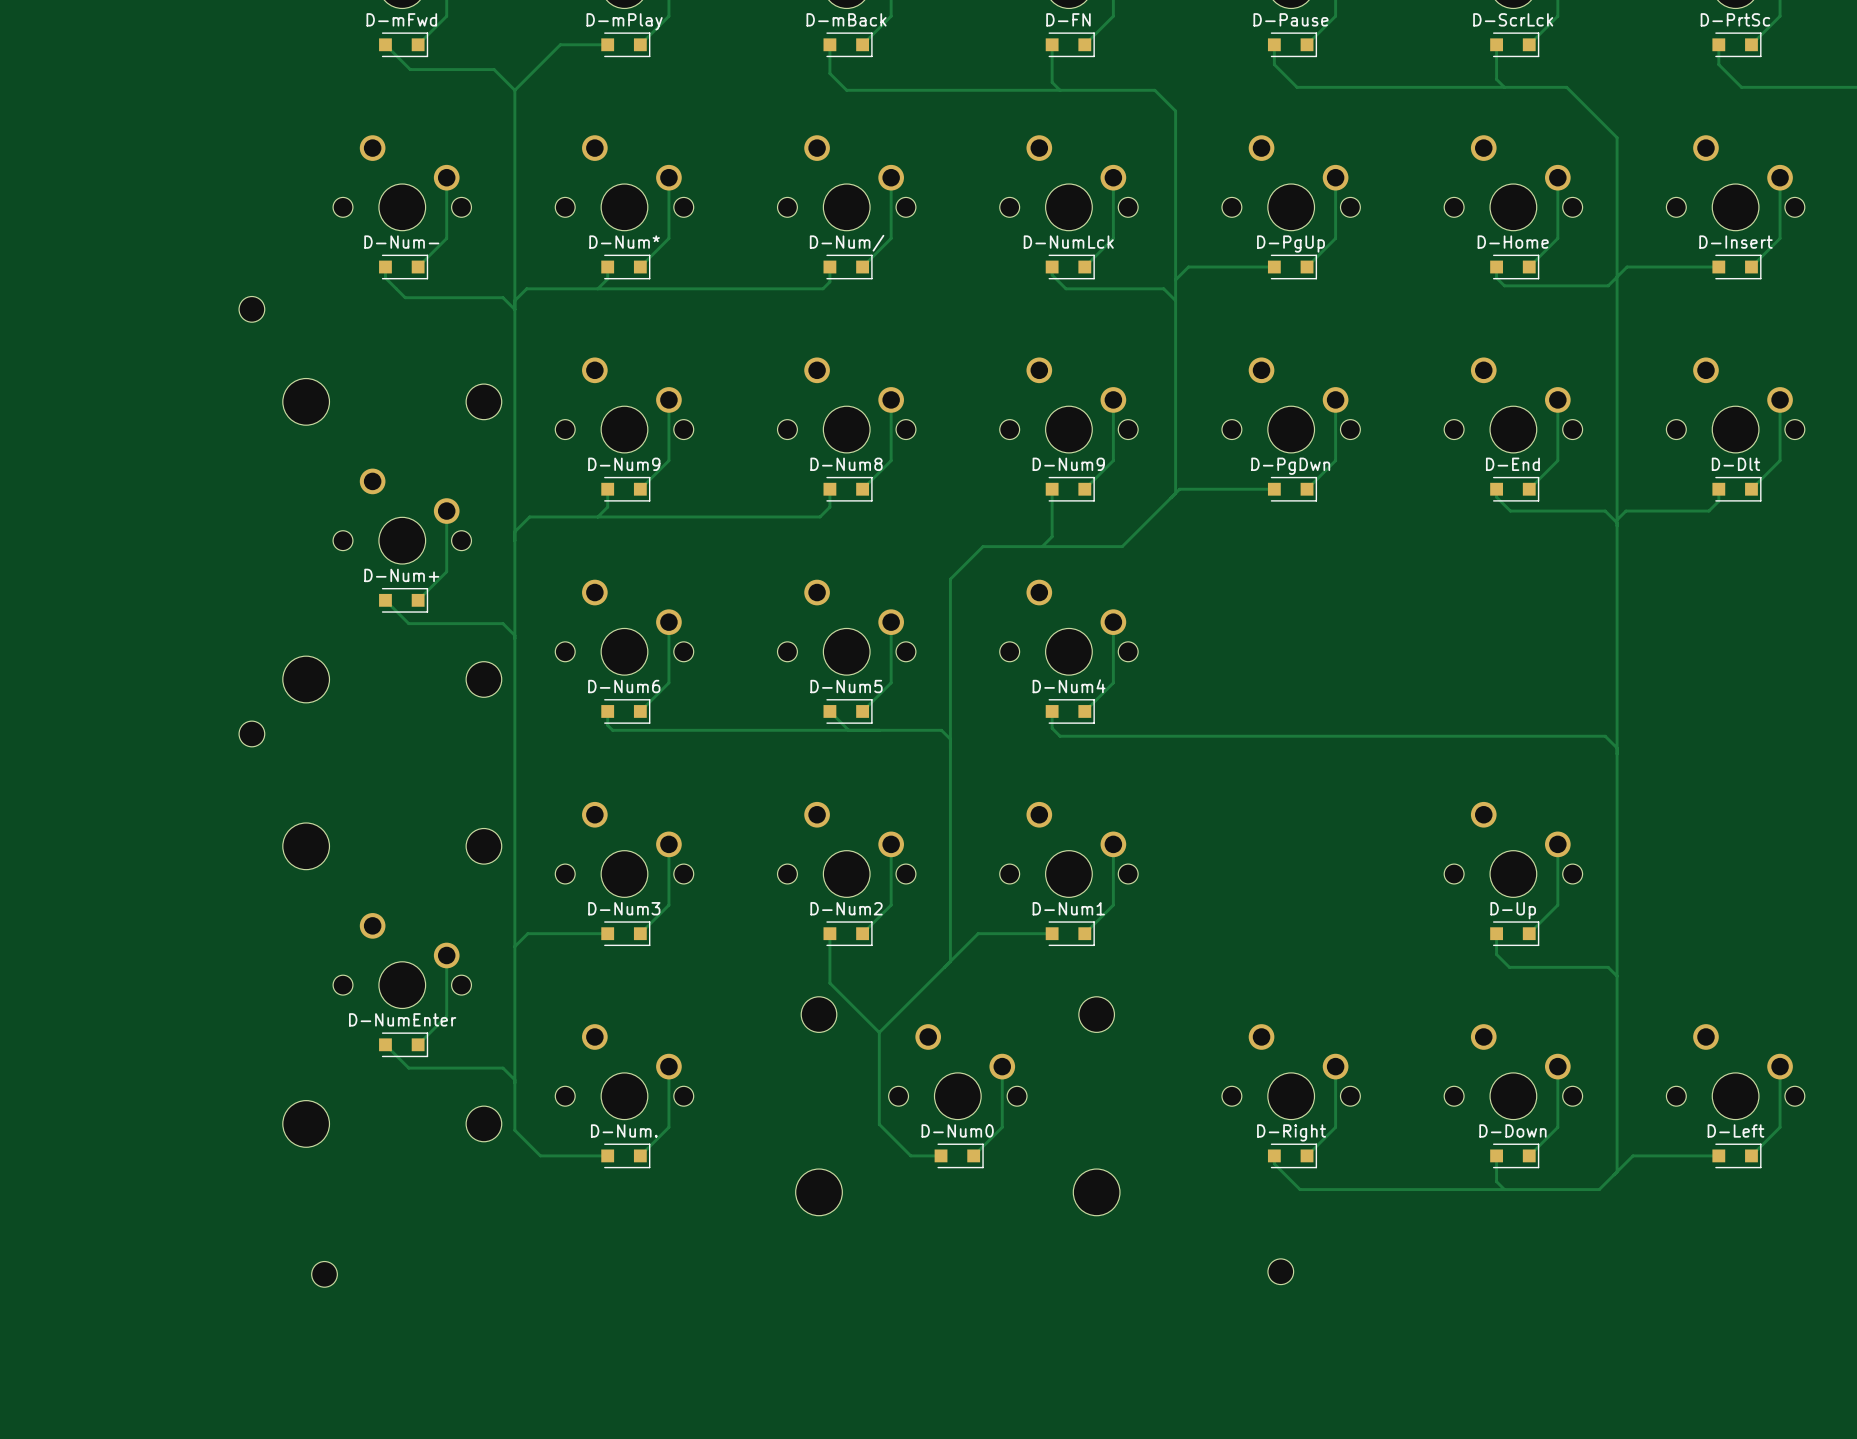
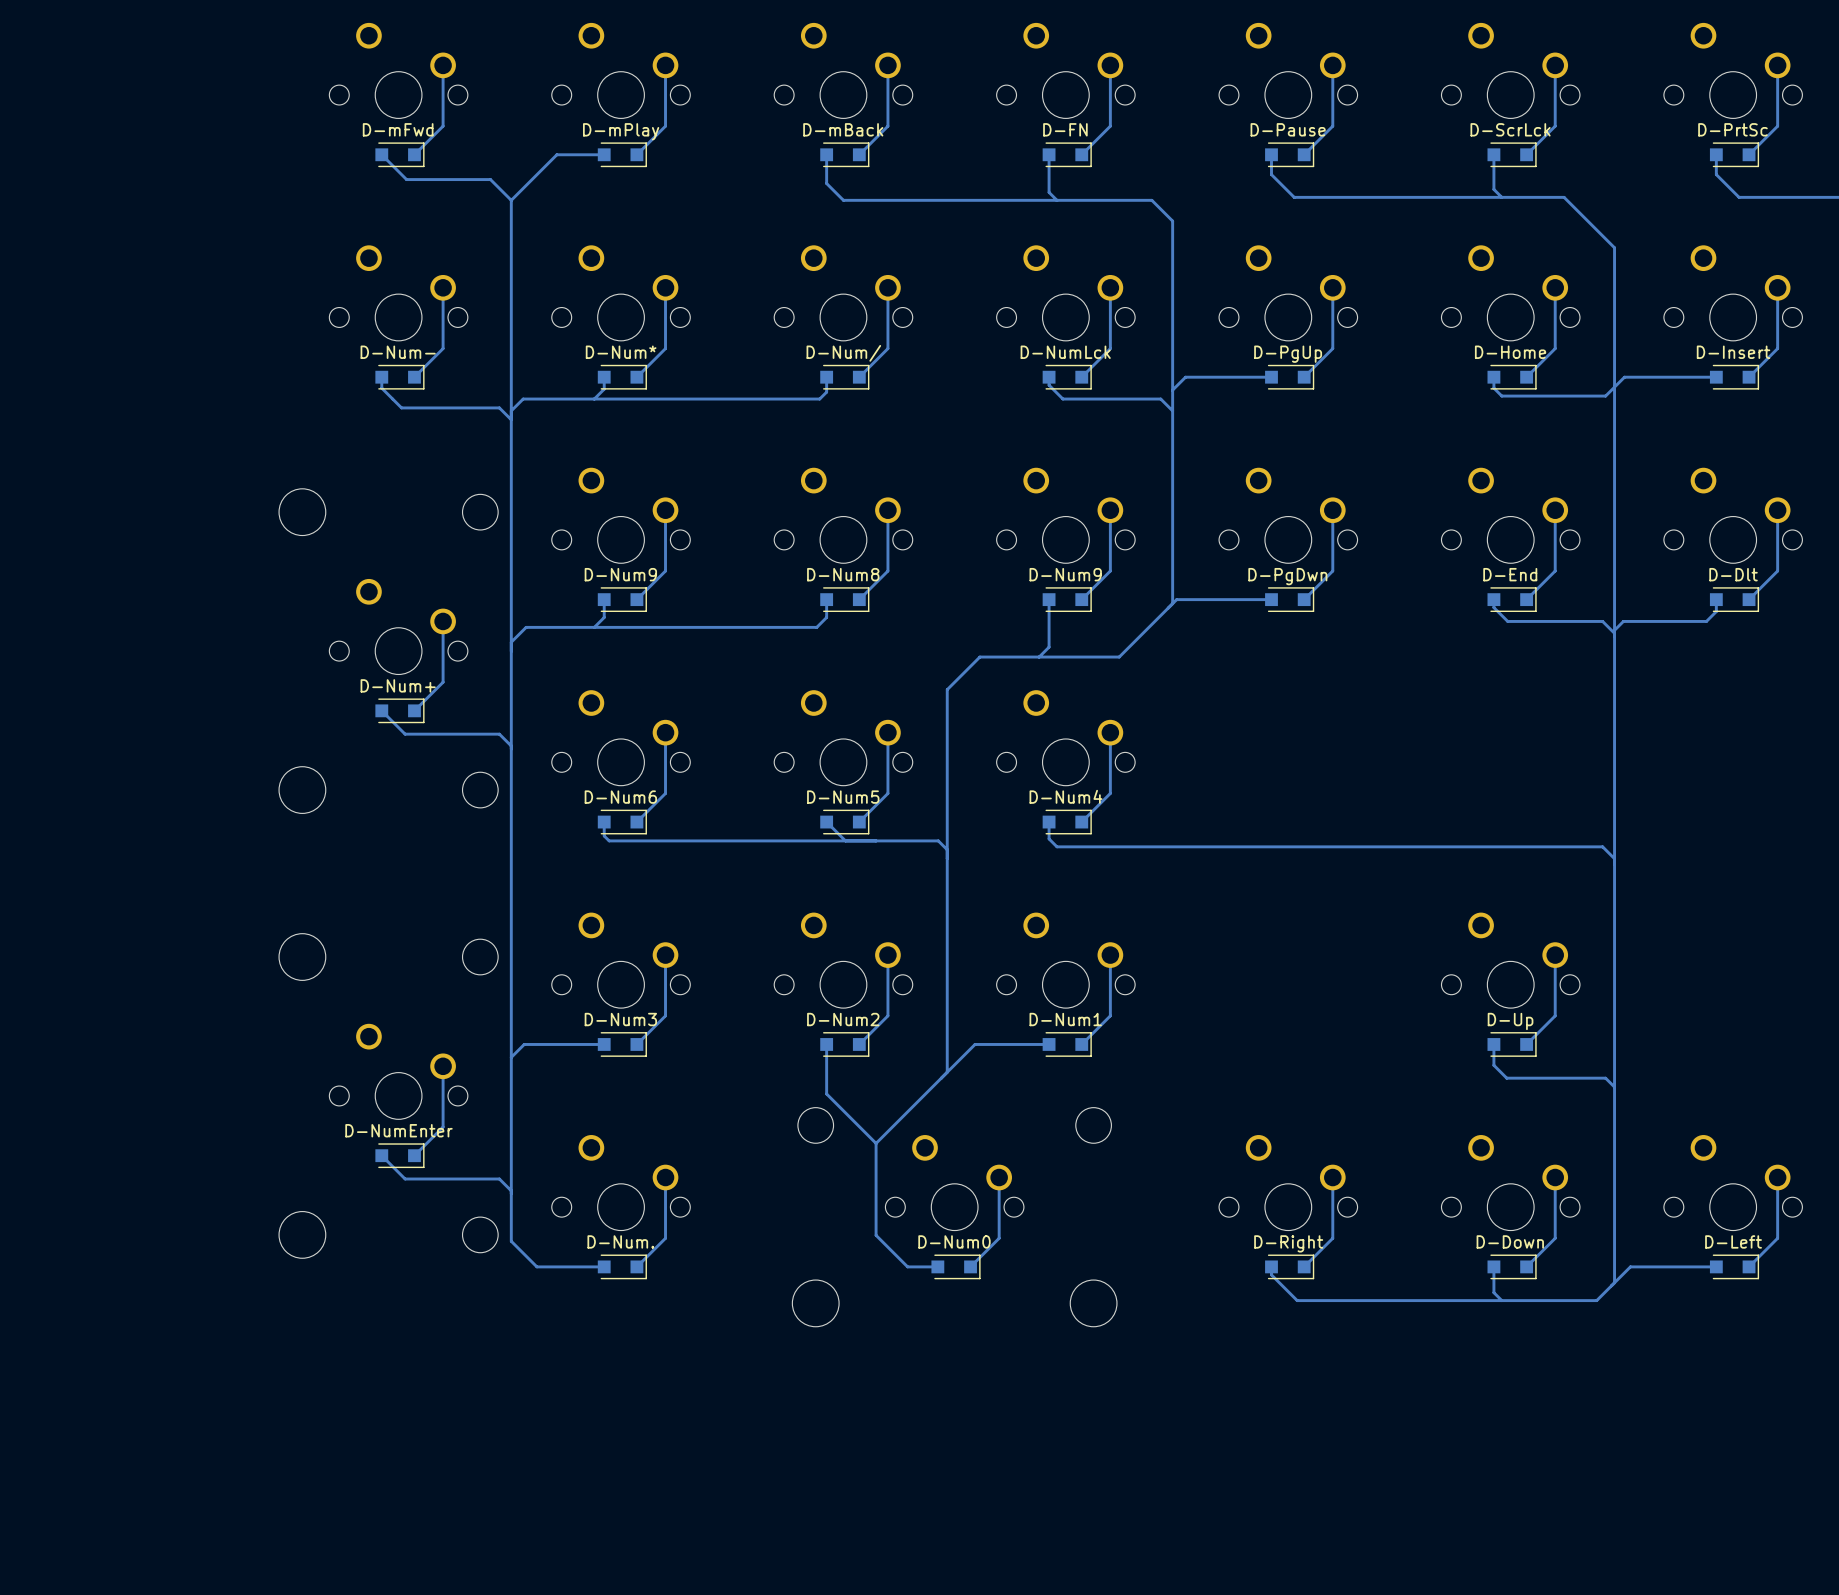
part: (251, 309) -> none
part: (251, 733) -> none
part: (1280, 1271) -> none
part: (324, 1274) -> none

